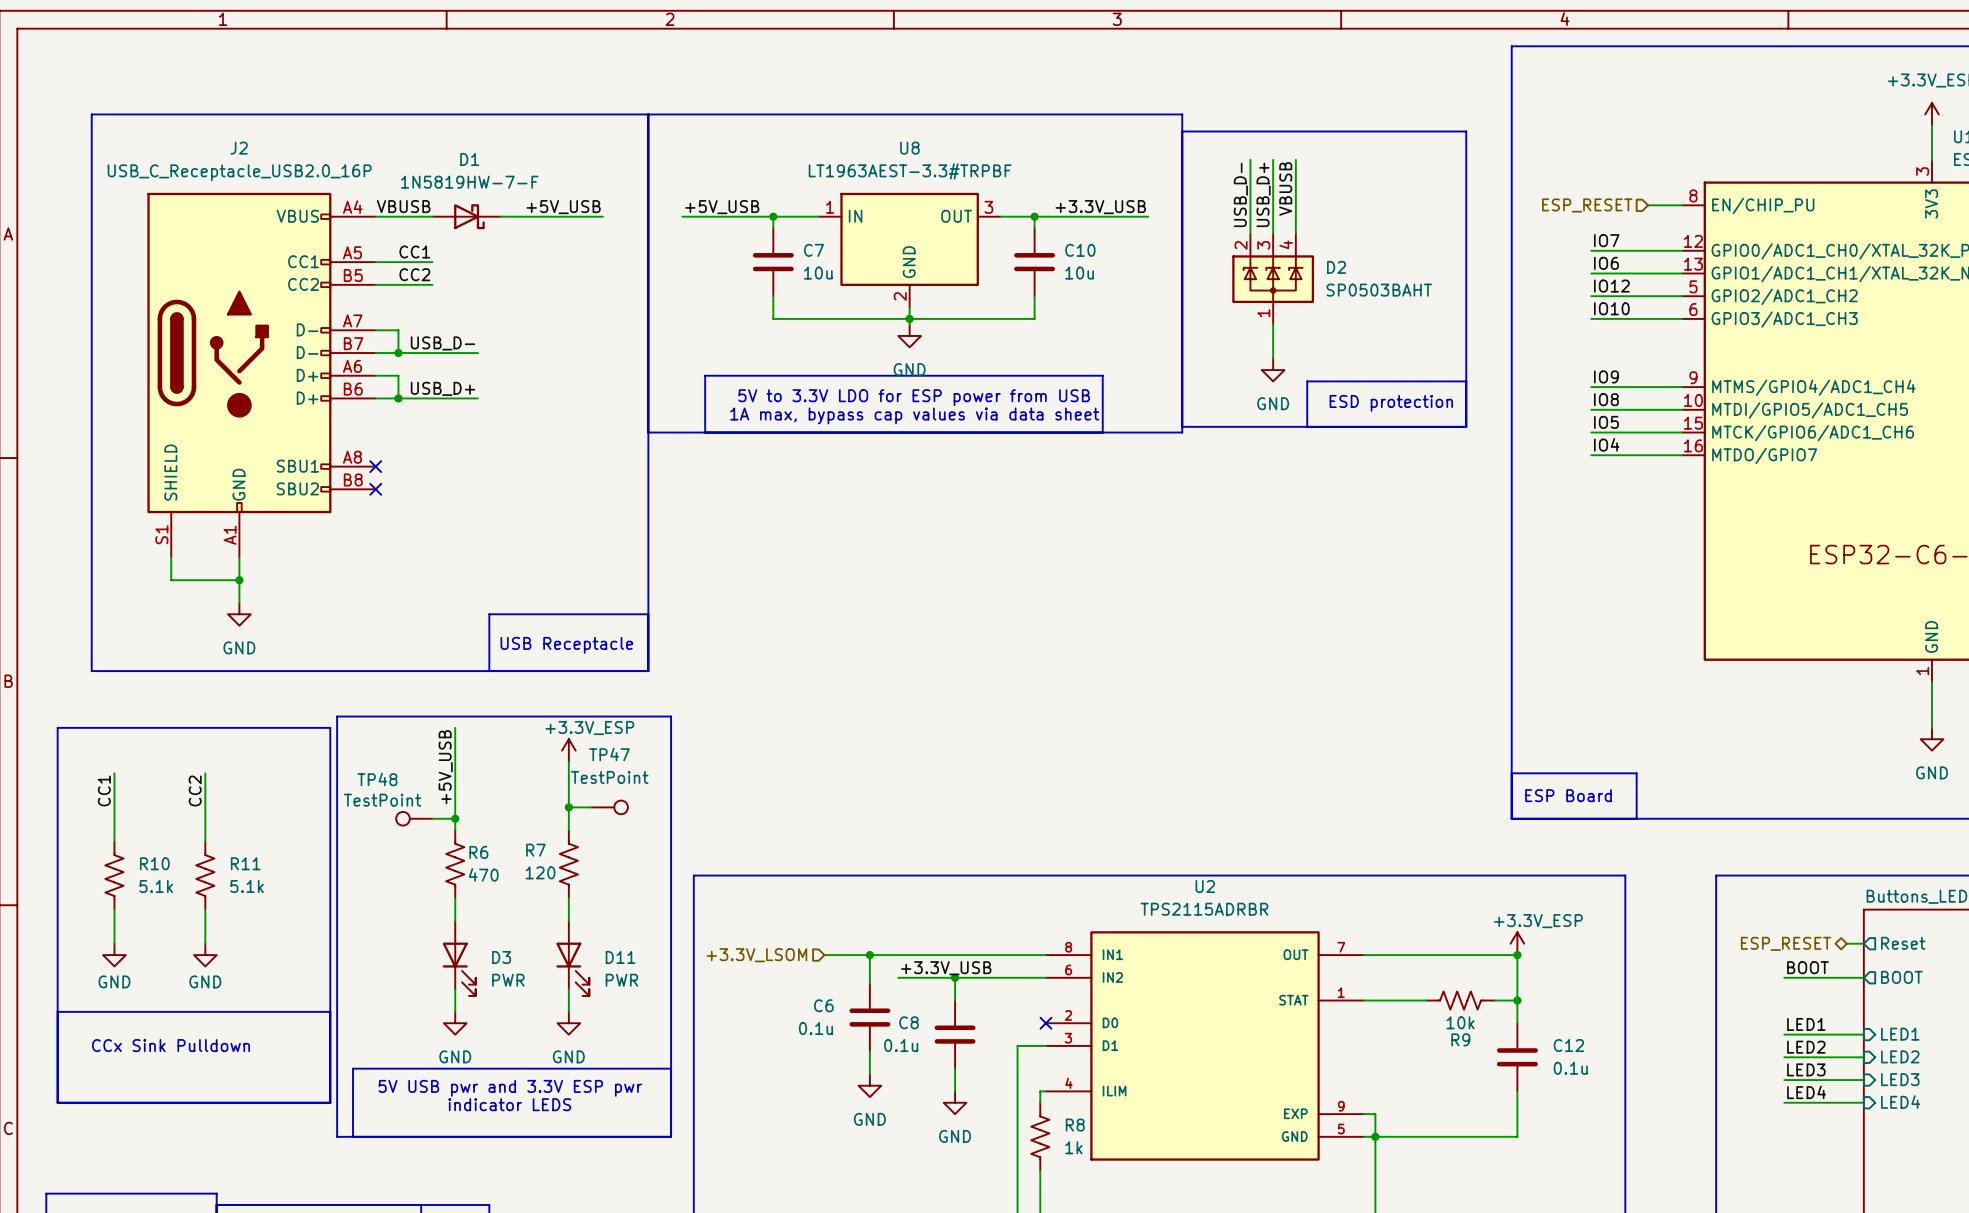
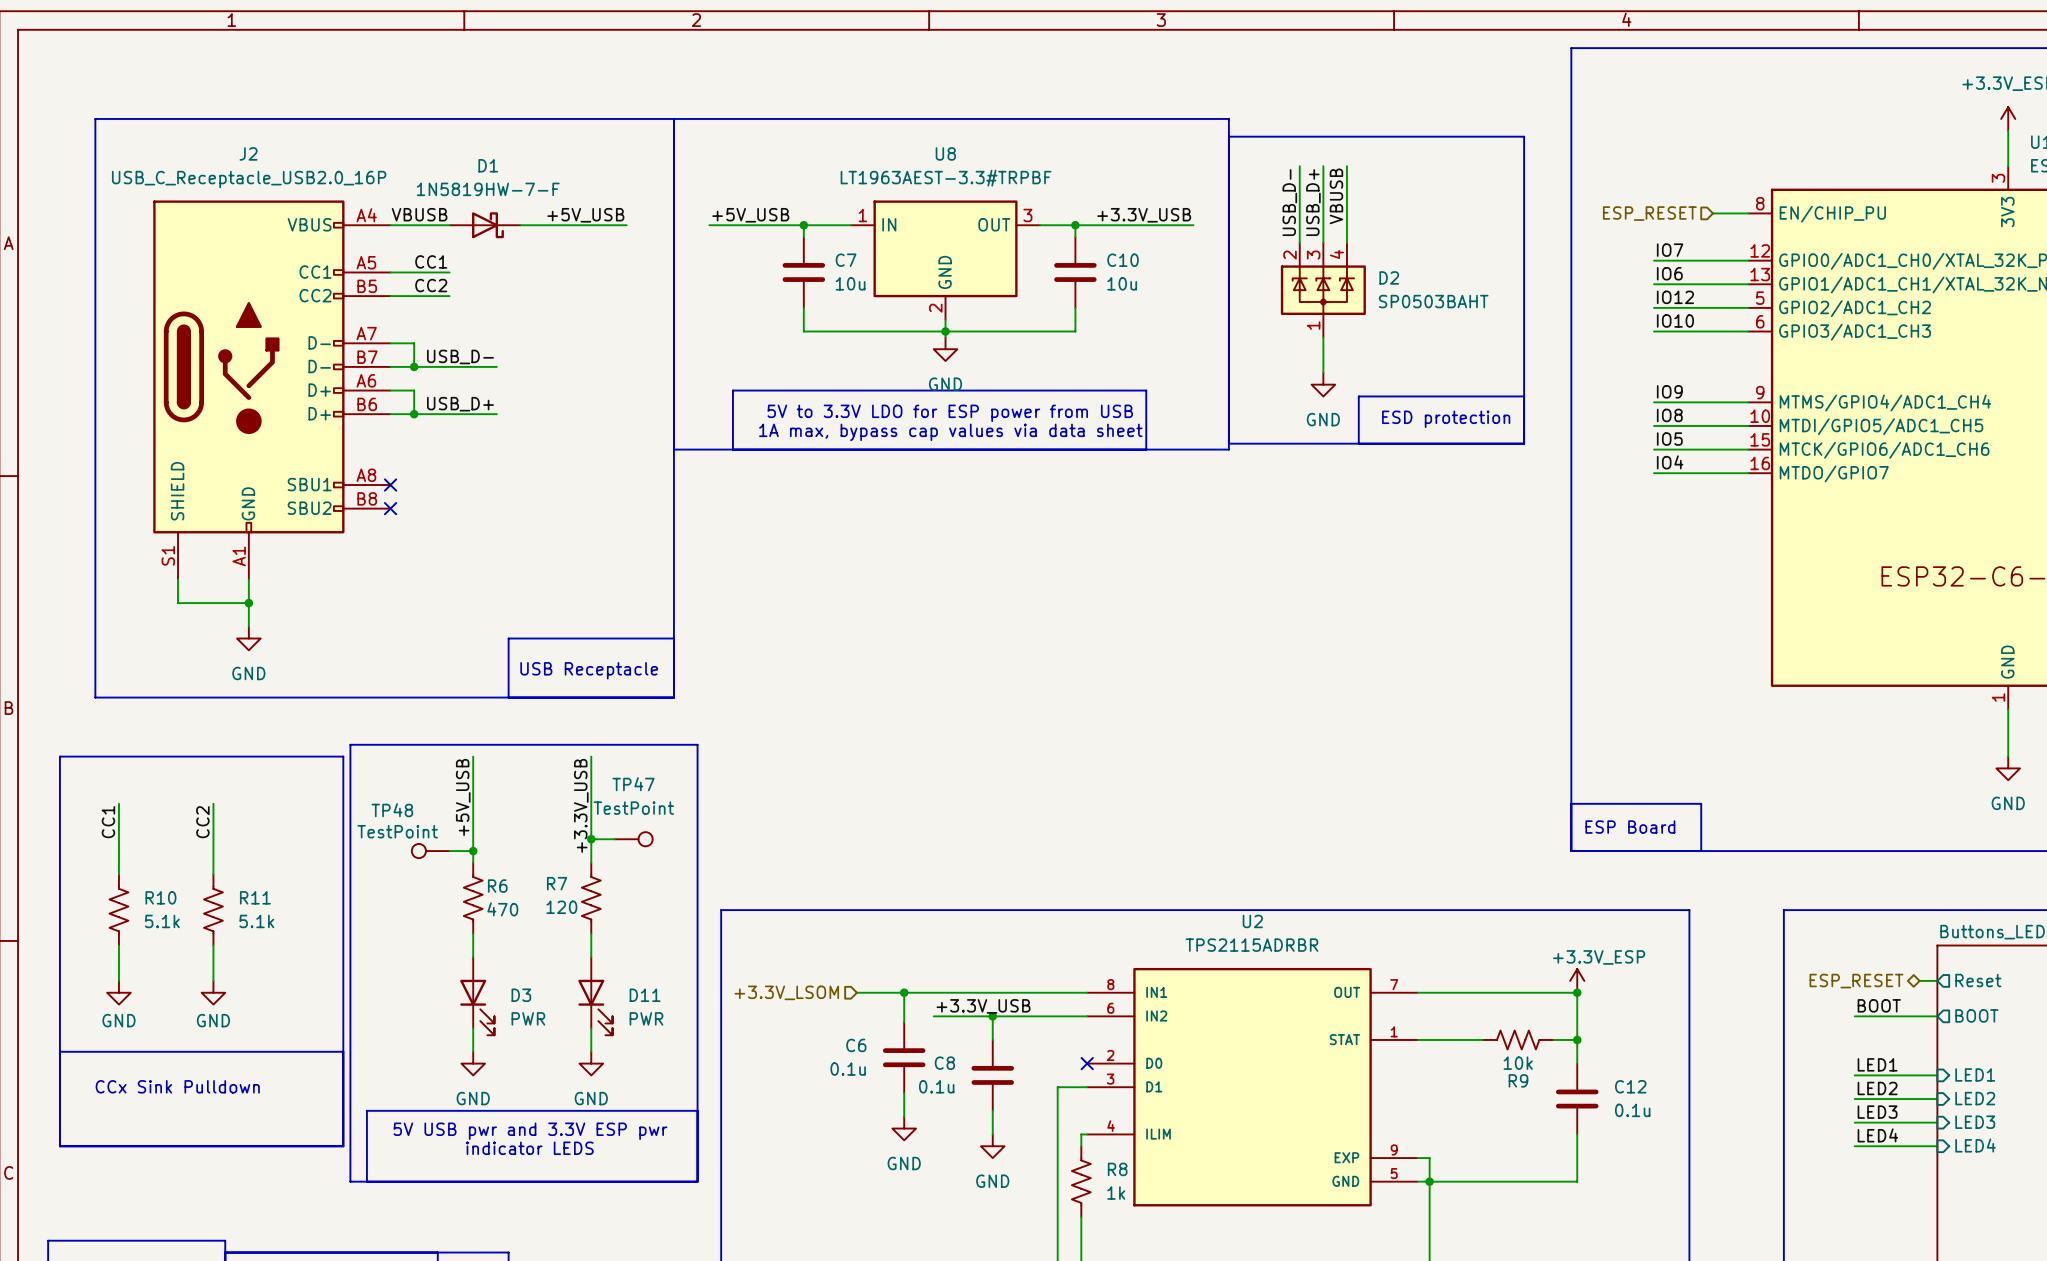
power symbol: +3.3V_ESP (568, 750) -> none
label: none -> +3.3V_USB (581, 805)

